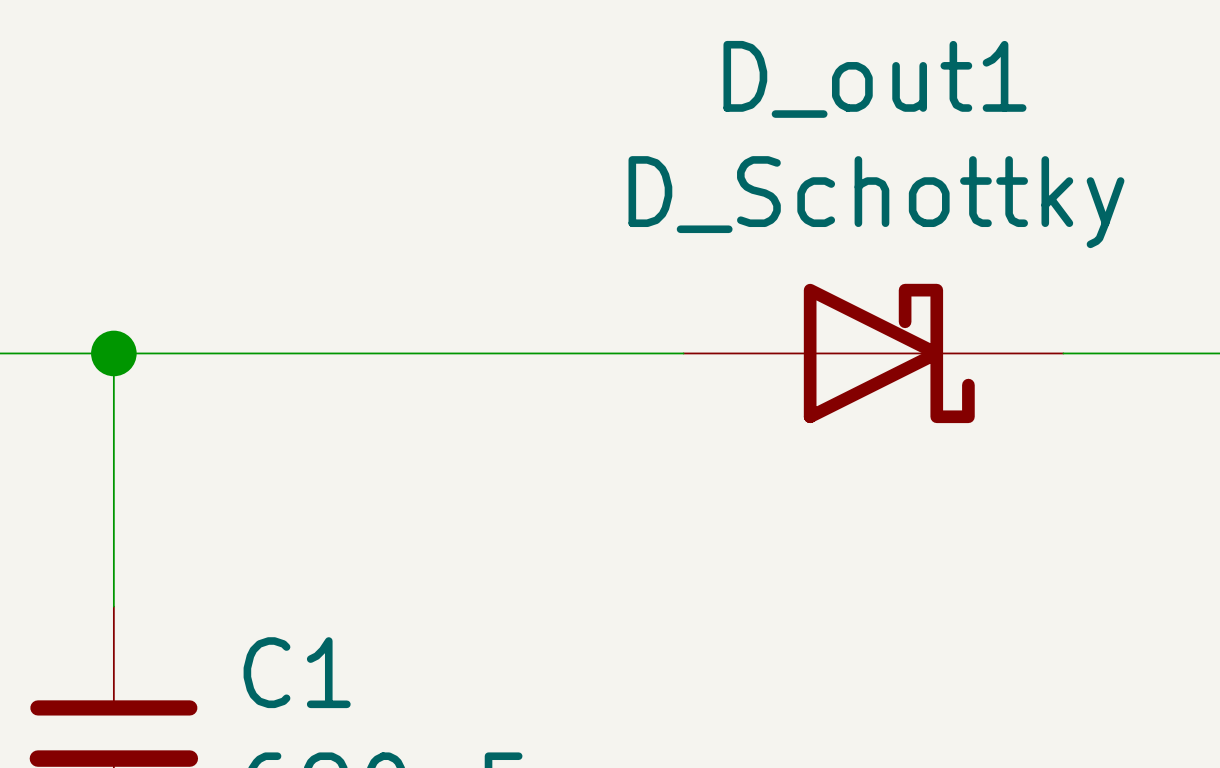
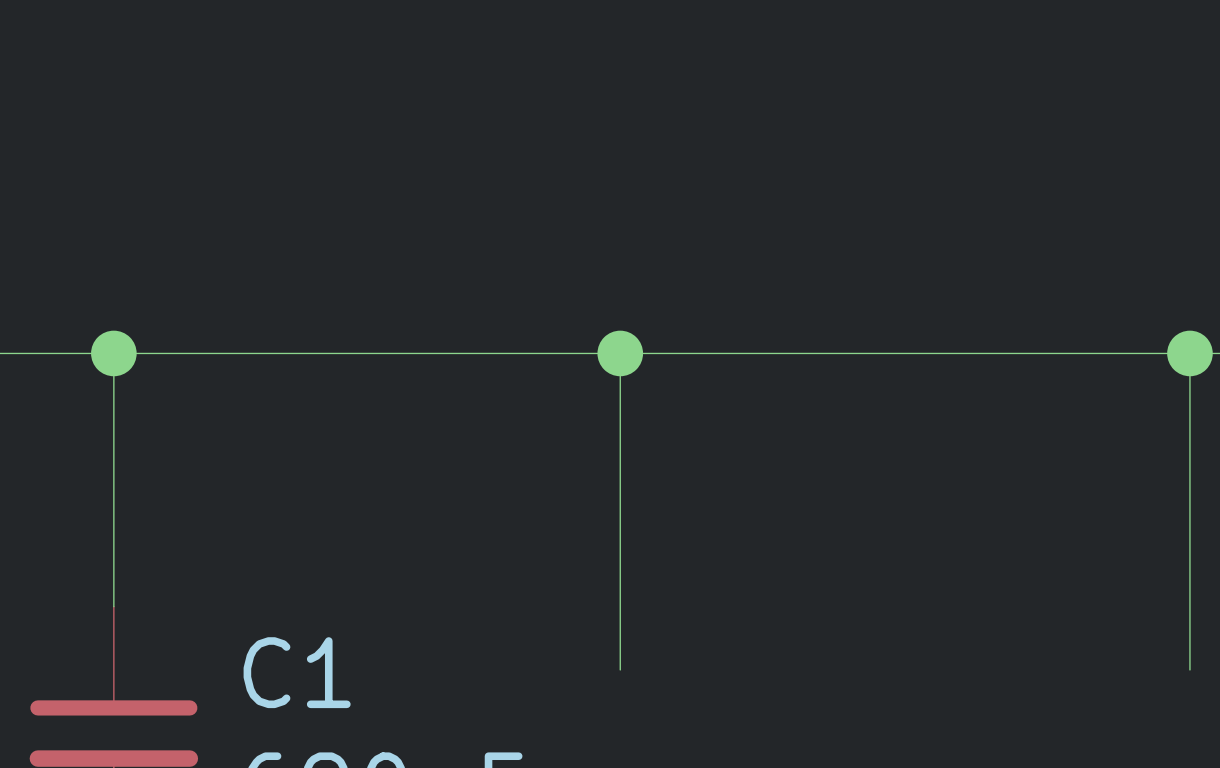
wire: none -> (620, 353) (620, 669)
junction: none -> (620, 353)
D_out1: D_Schottky (873, 353) -> none
wire: none -> (1189, 353) (1189, 669)
junction: none -> (1189, 353)

